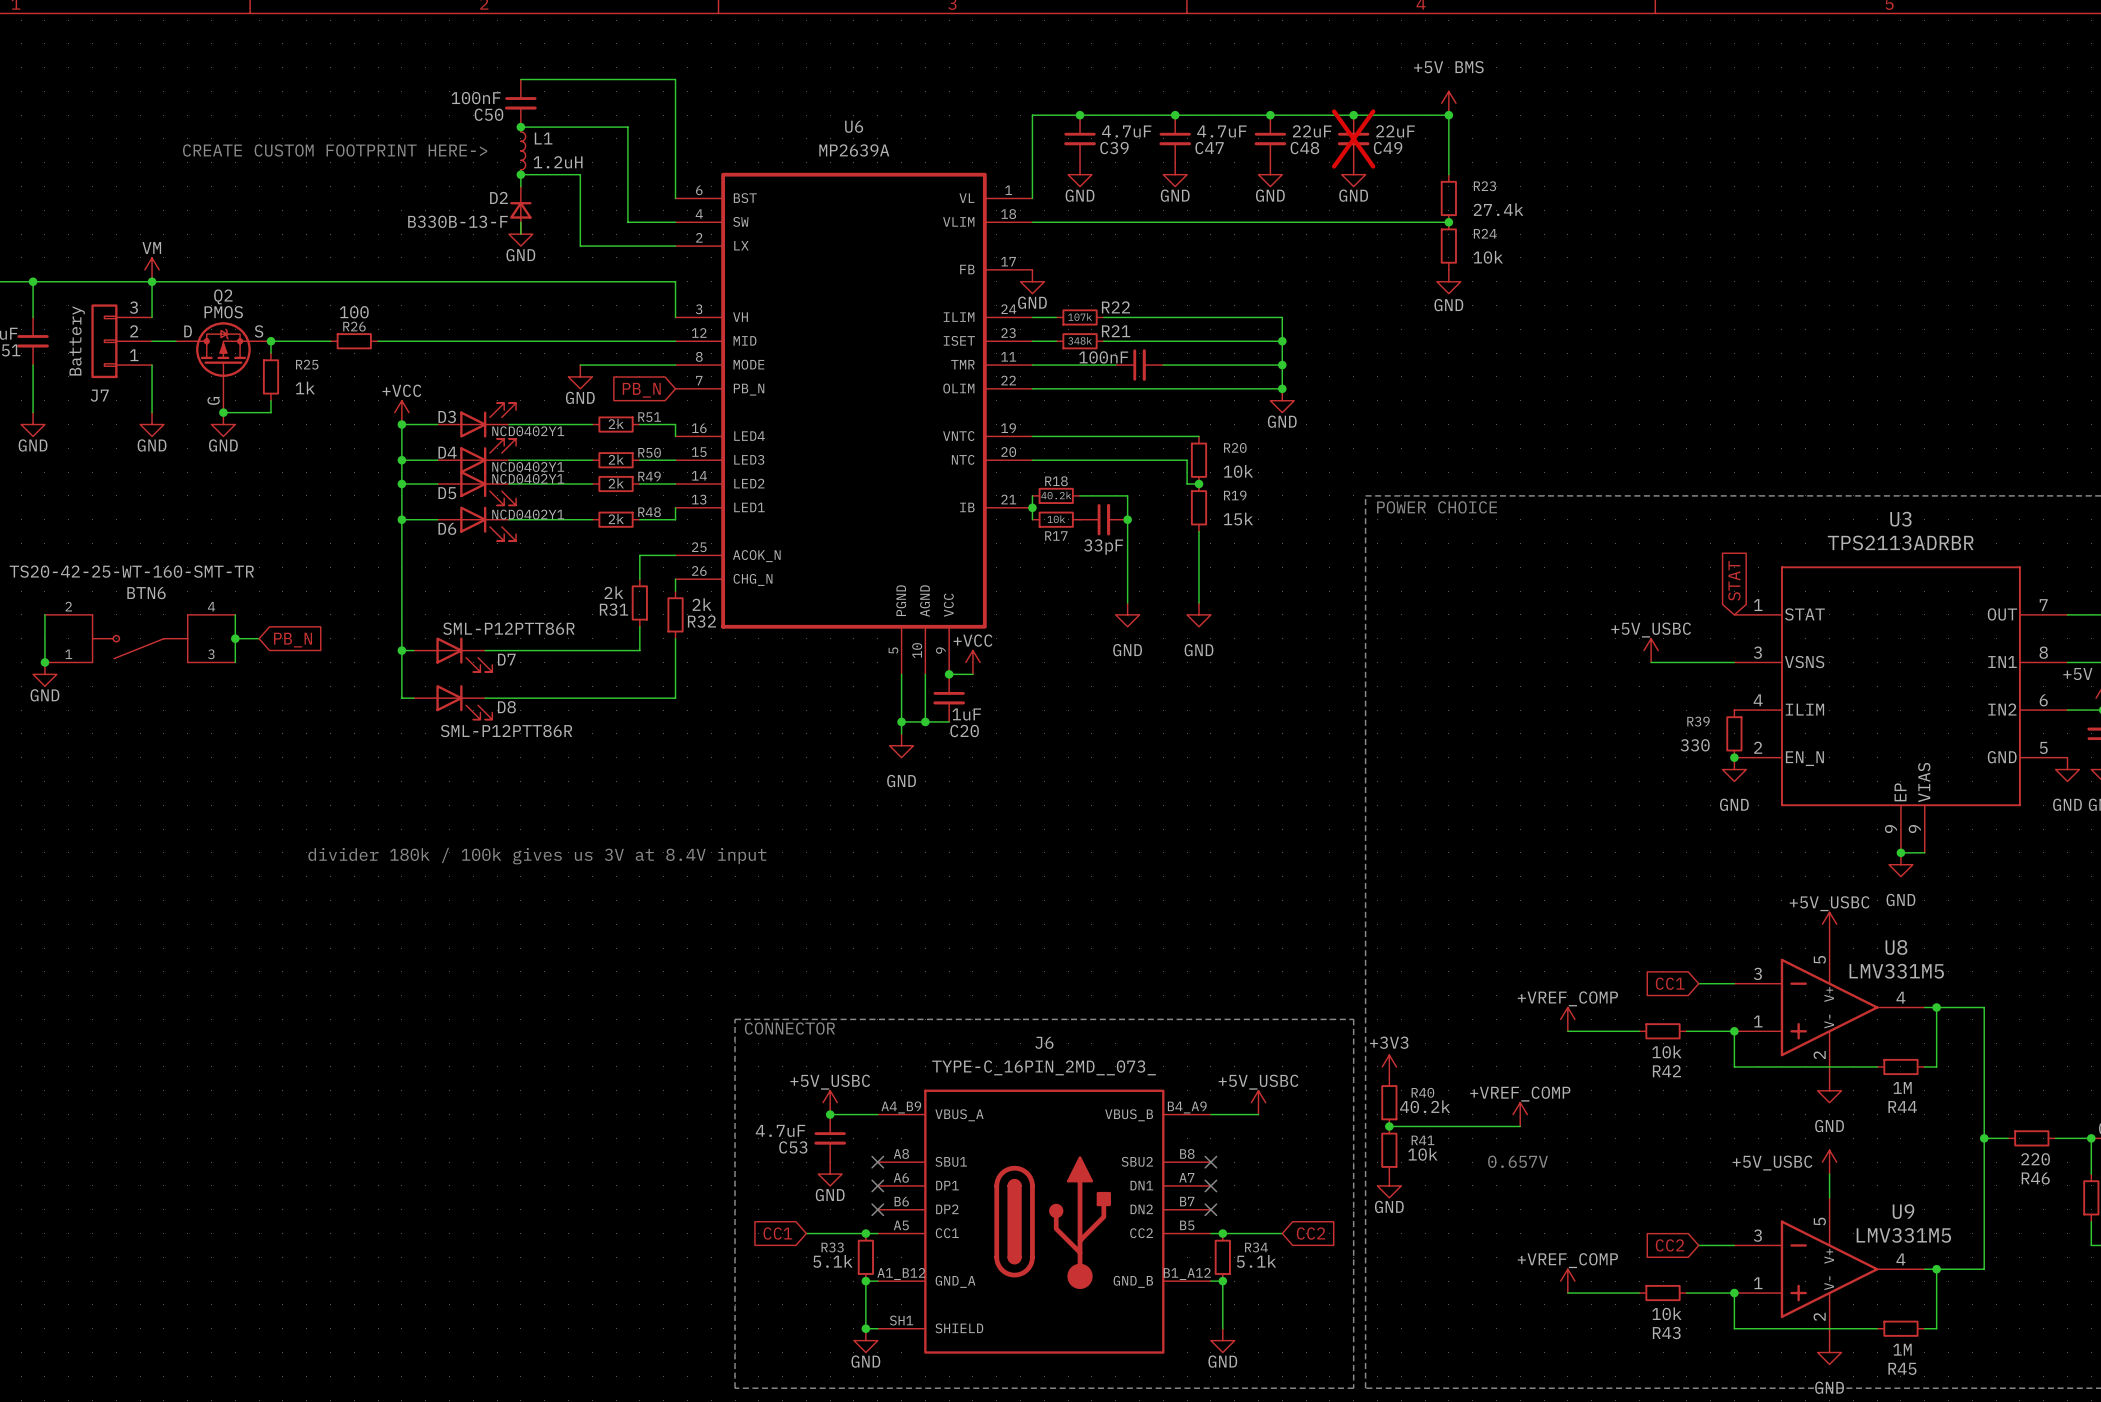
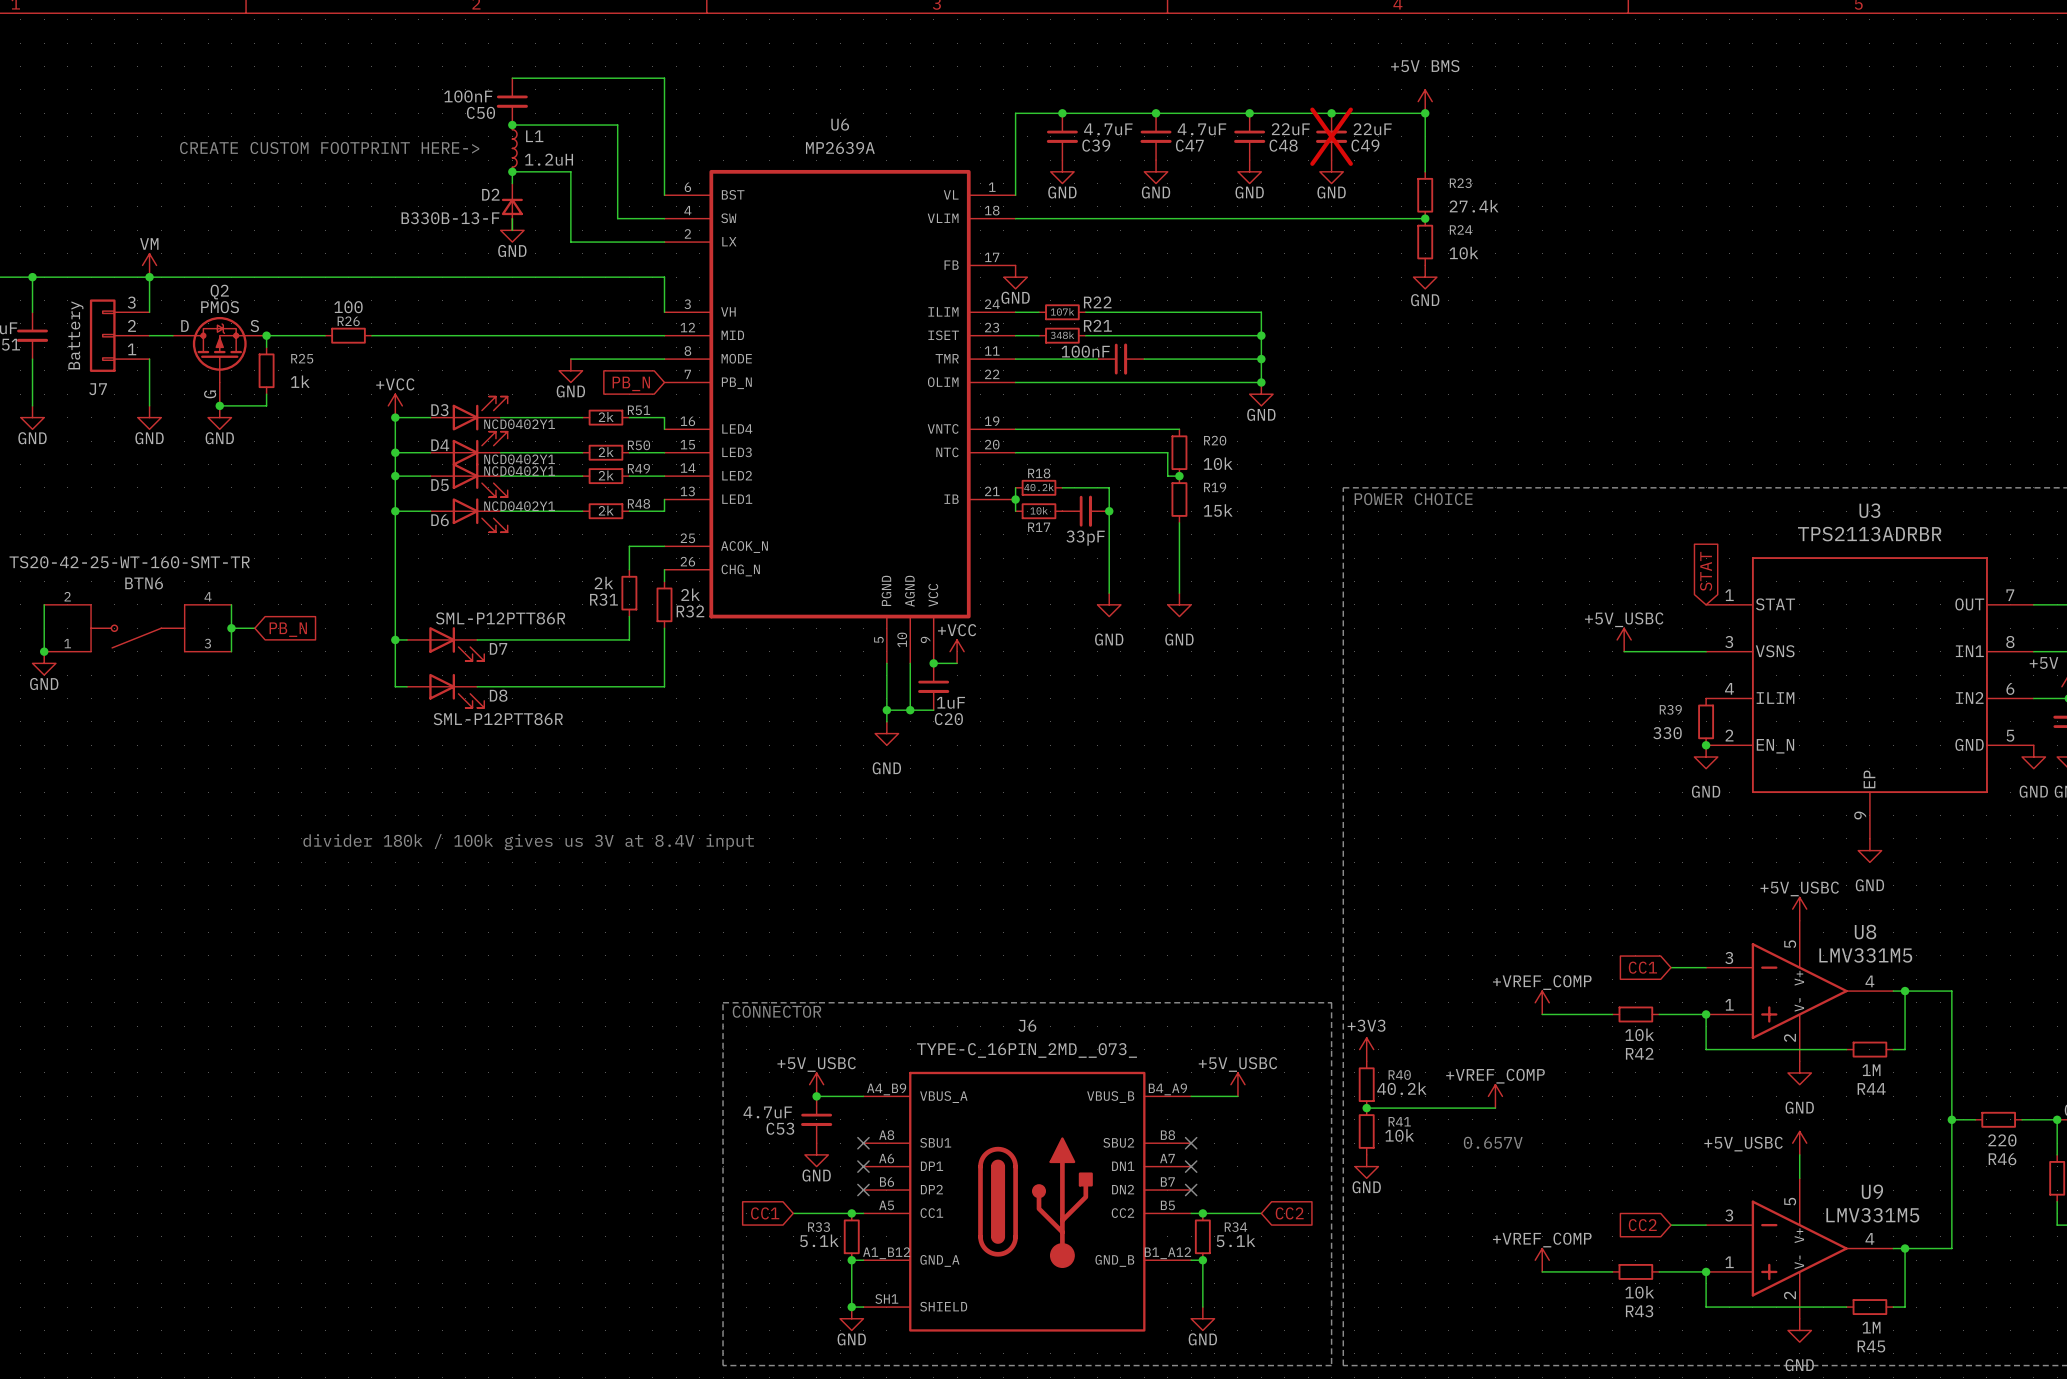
U3 symbol: [1734, 566, 2068, 853] -> [1706, 557, 2034, 839]
wire: (1900, 852) (1924, 852) -> none
junction: (1900, 852) -> none

